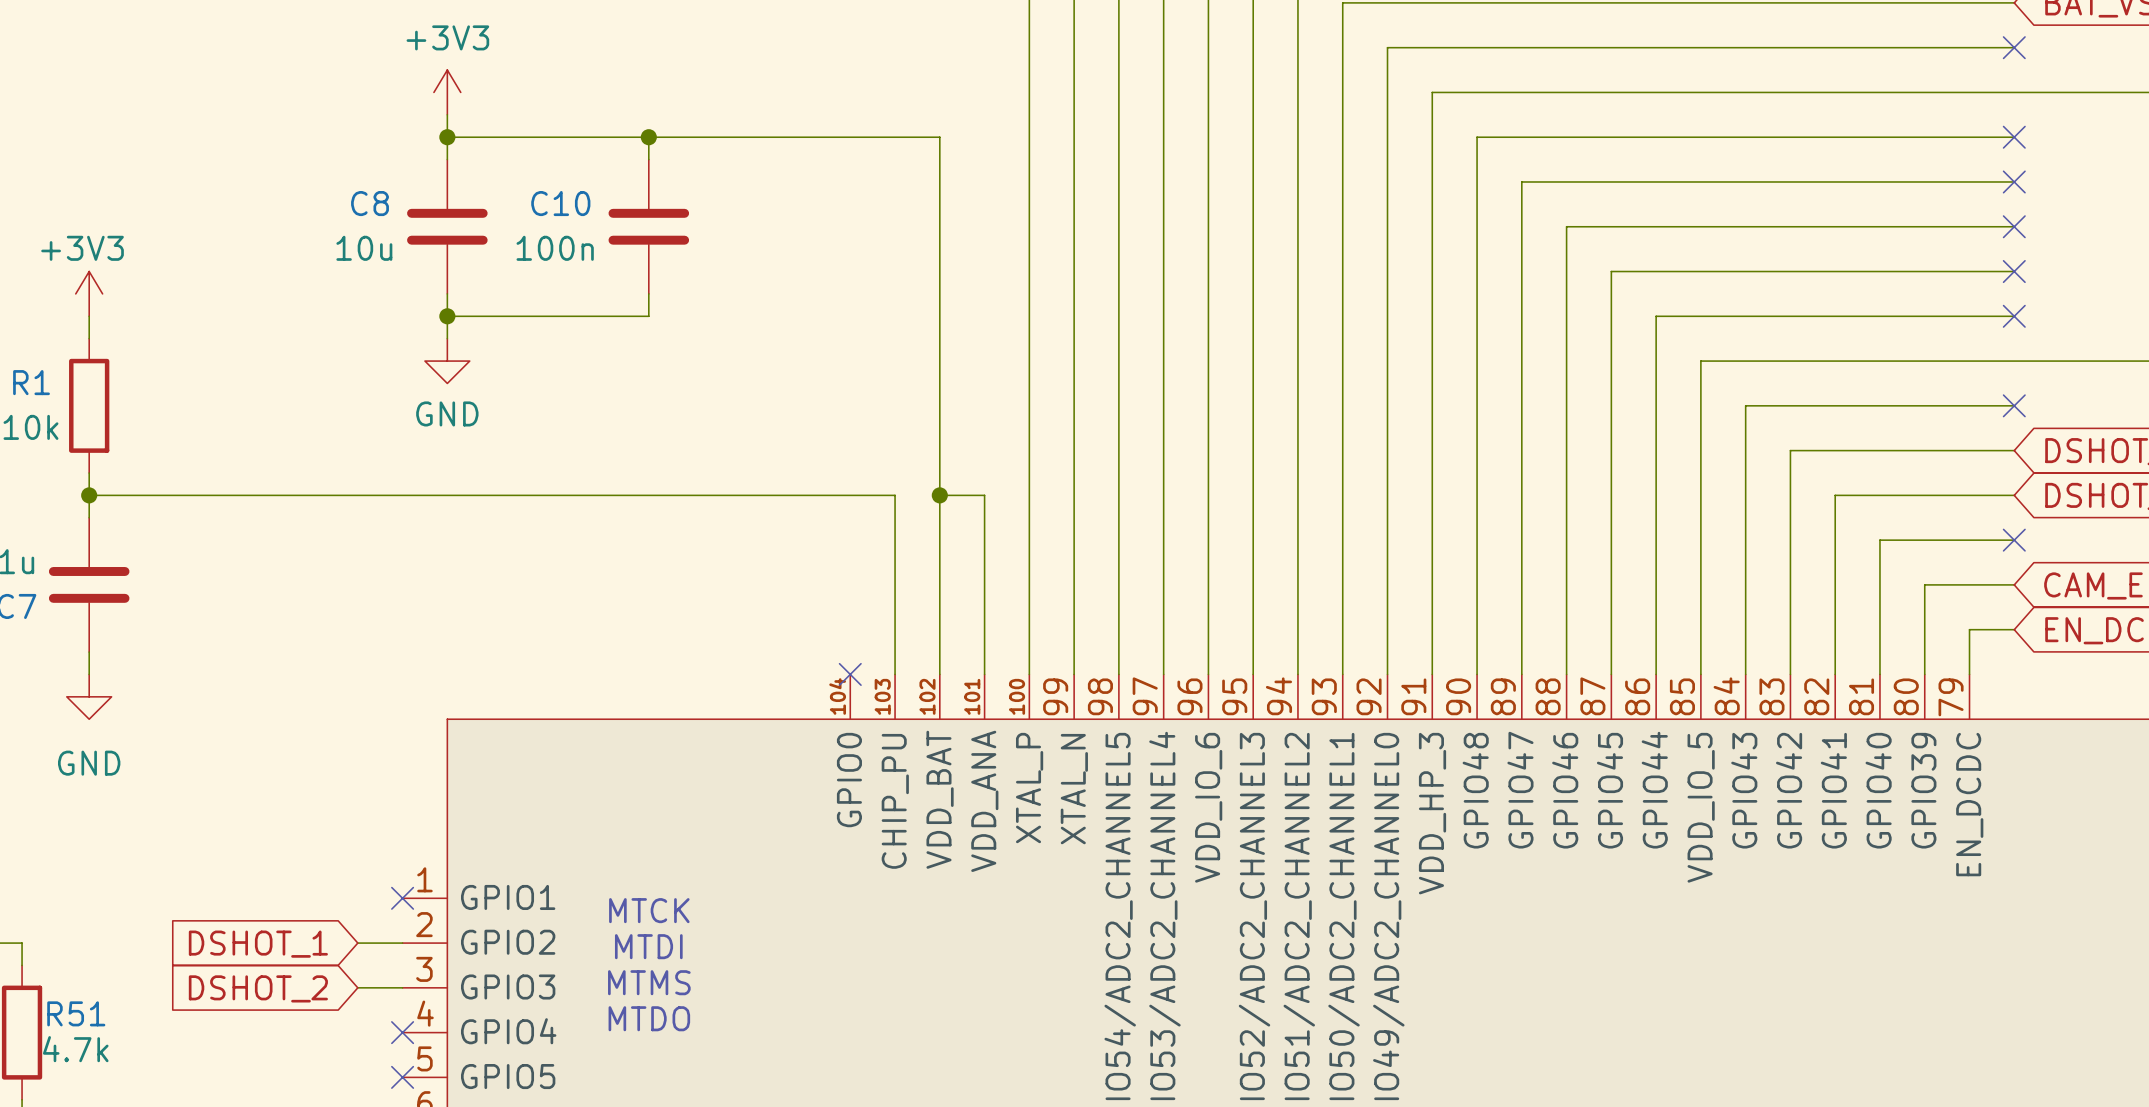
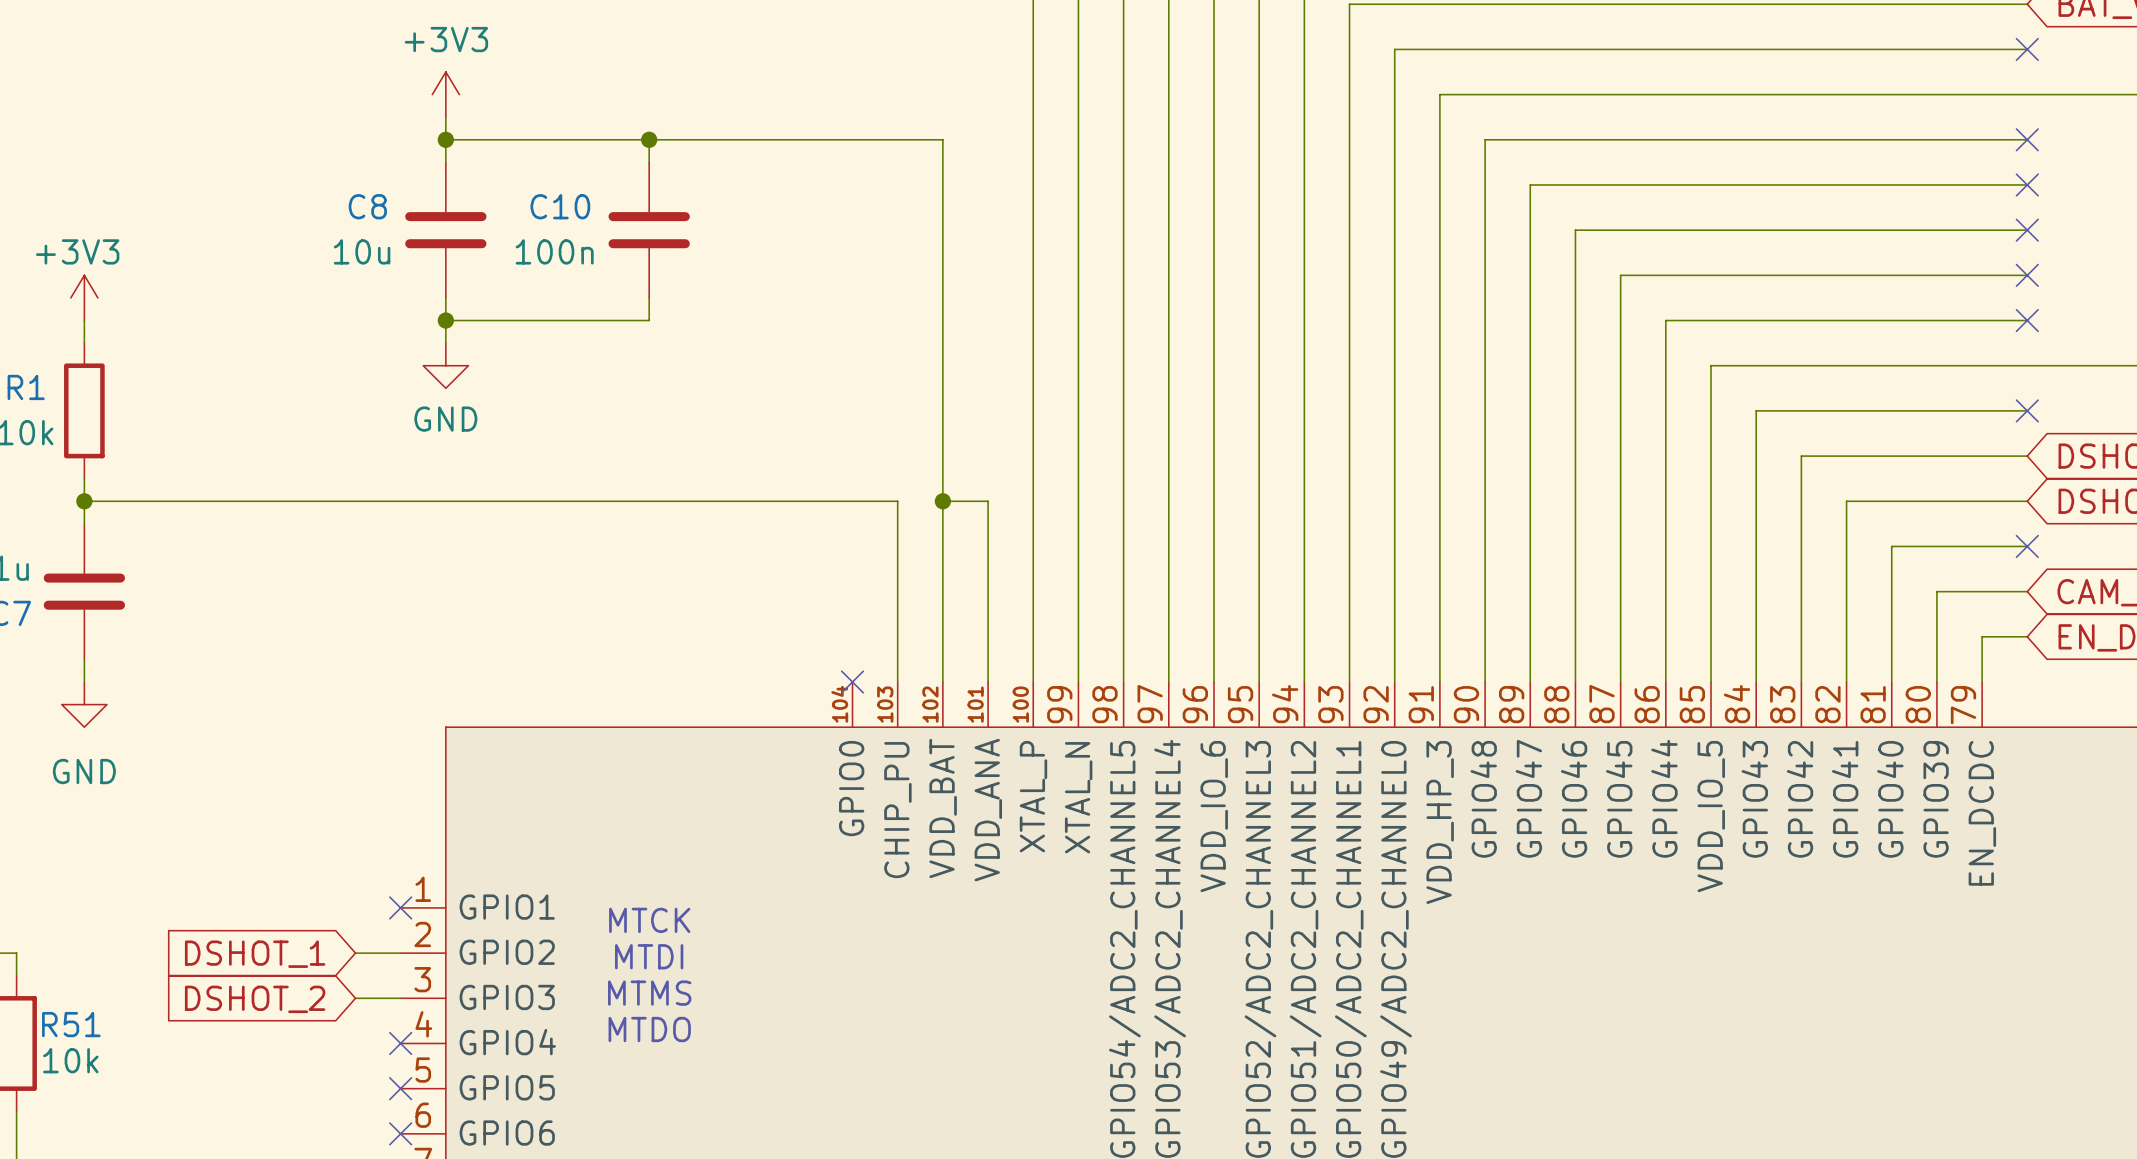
R51 value: 4.7k (75, 1049) -> 10k (70, 1060)

